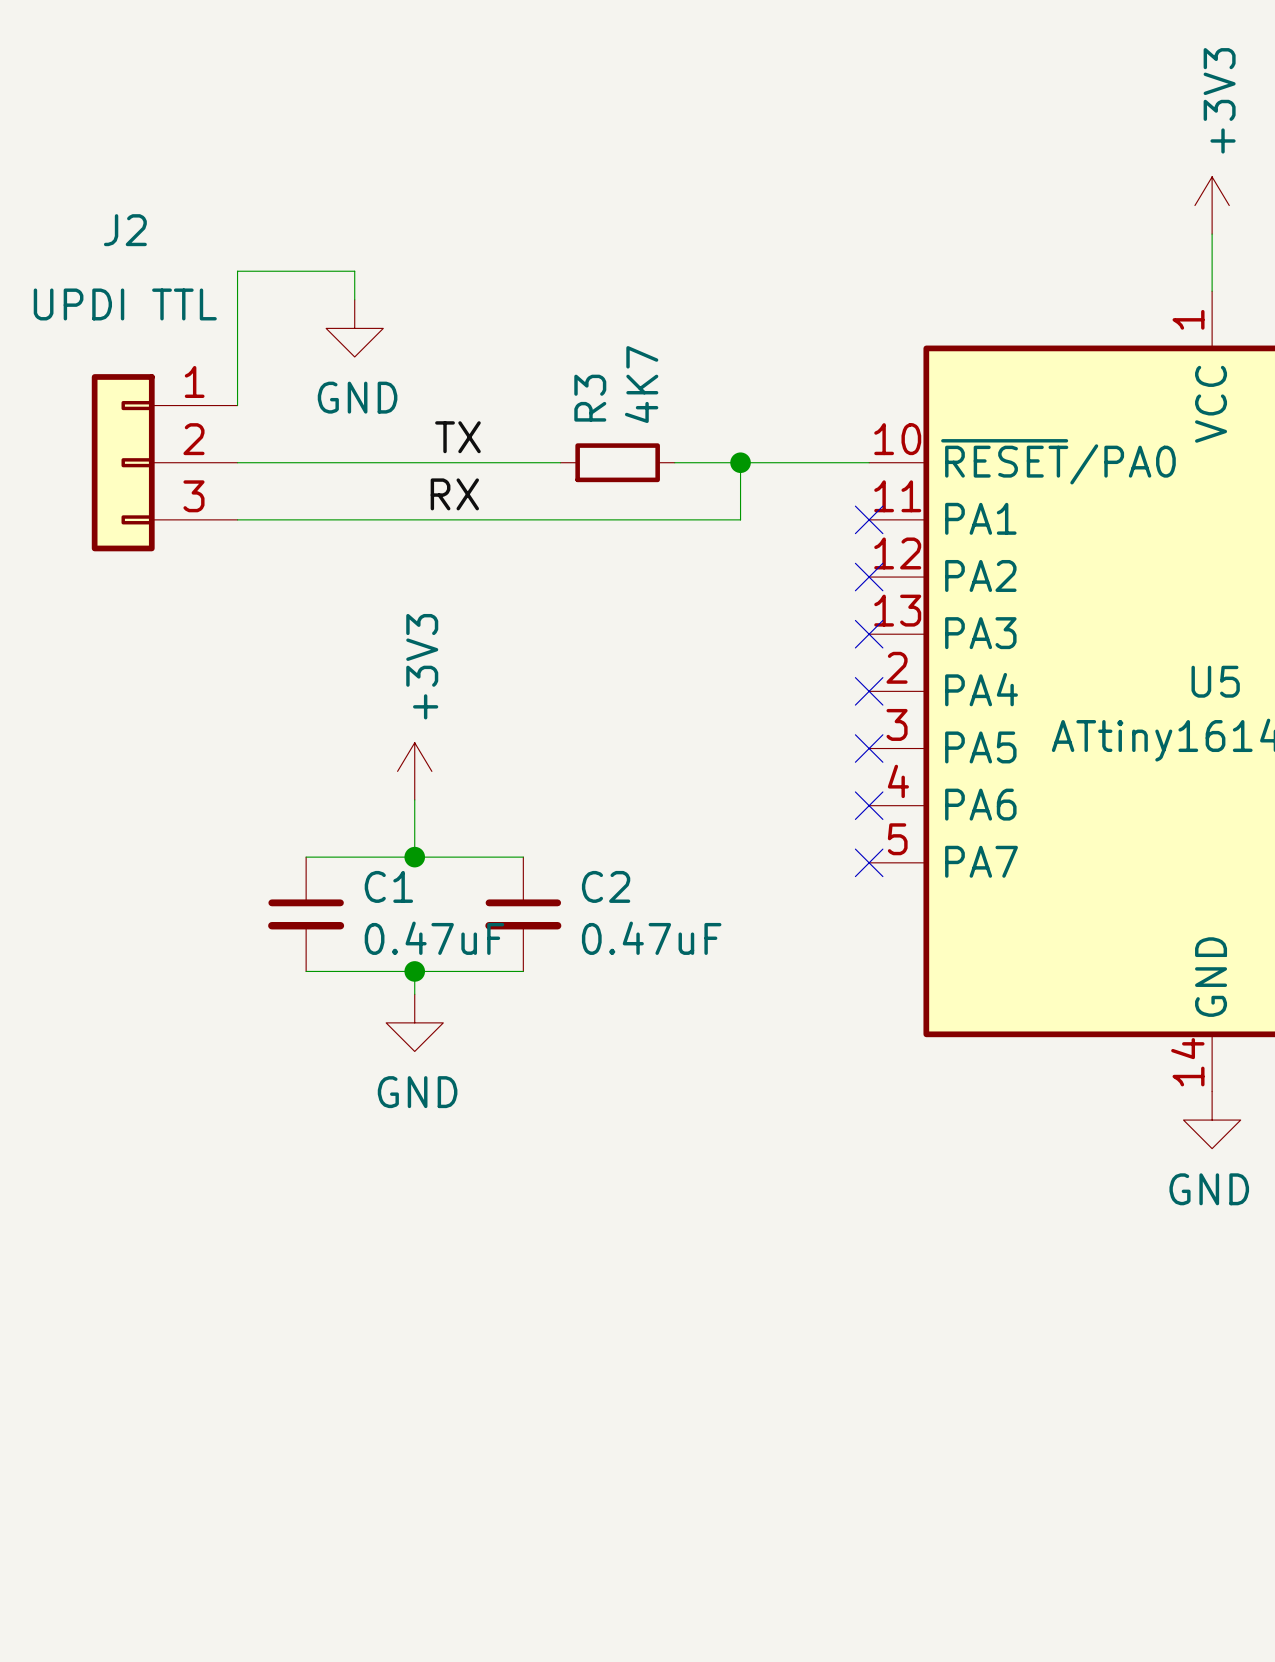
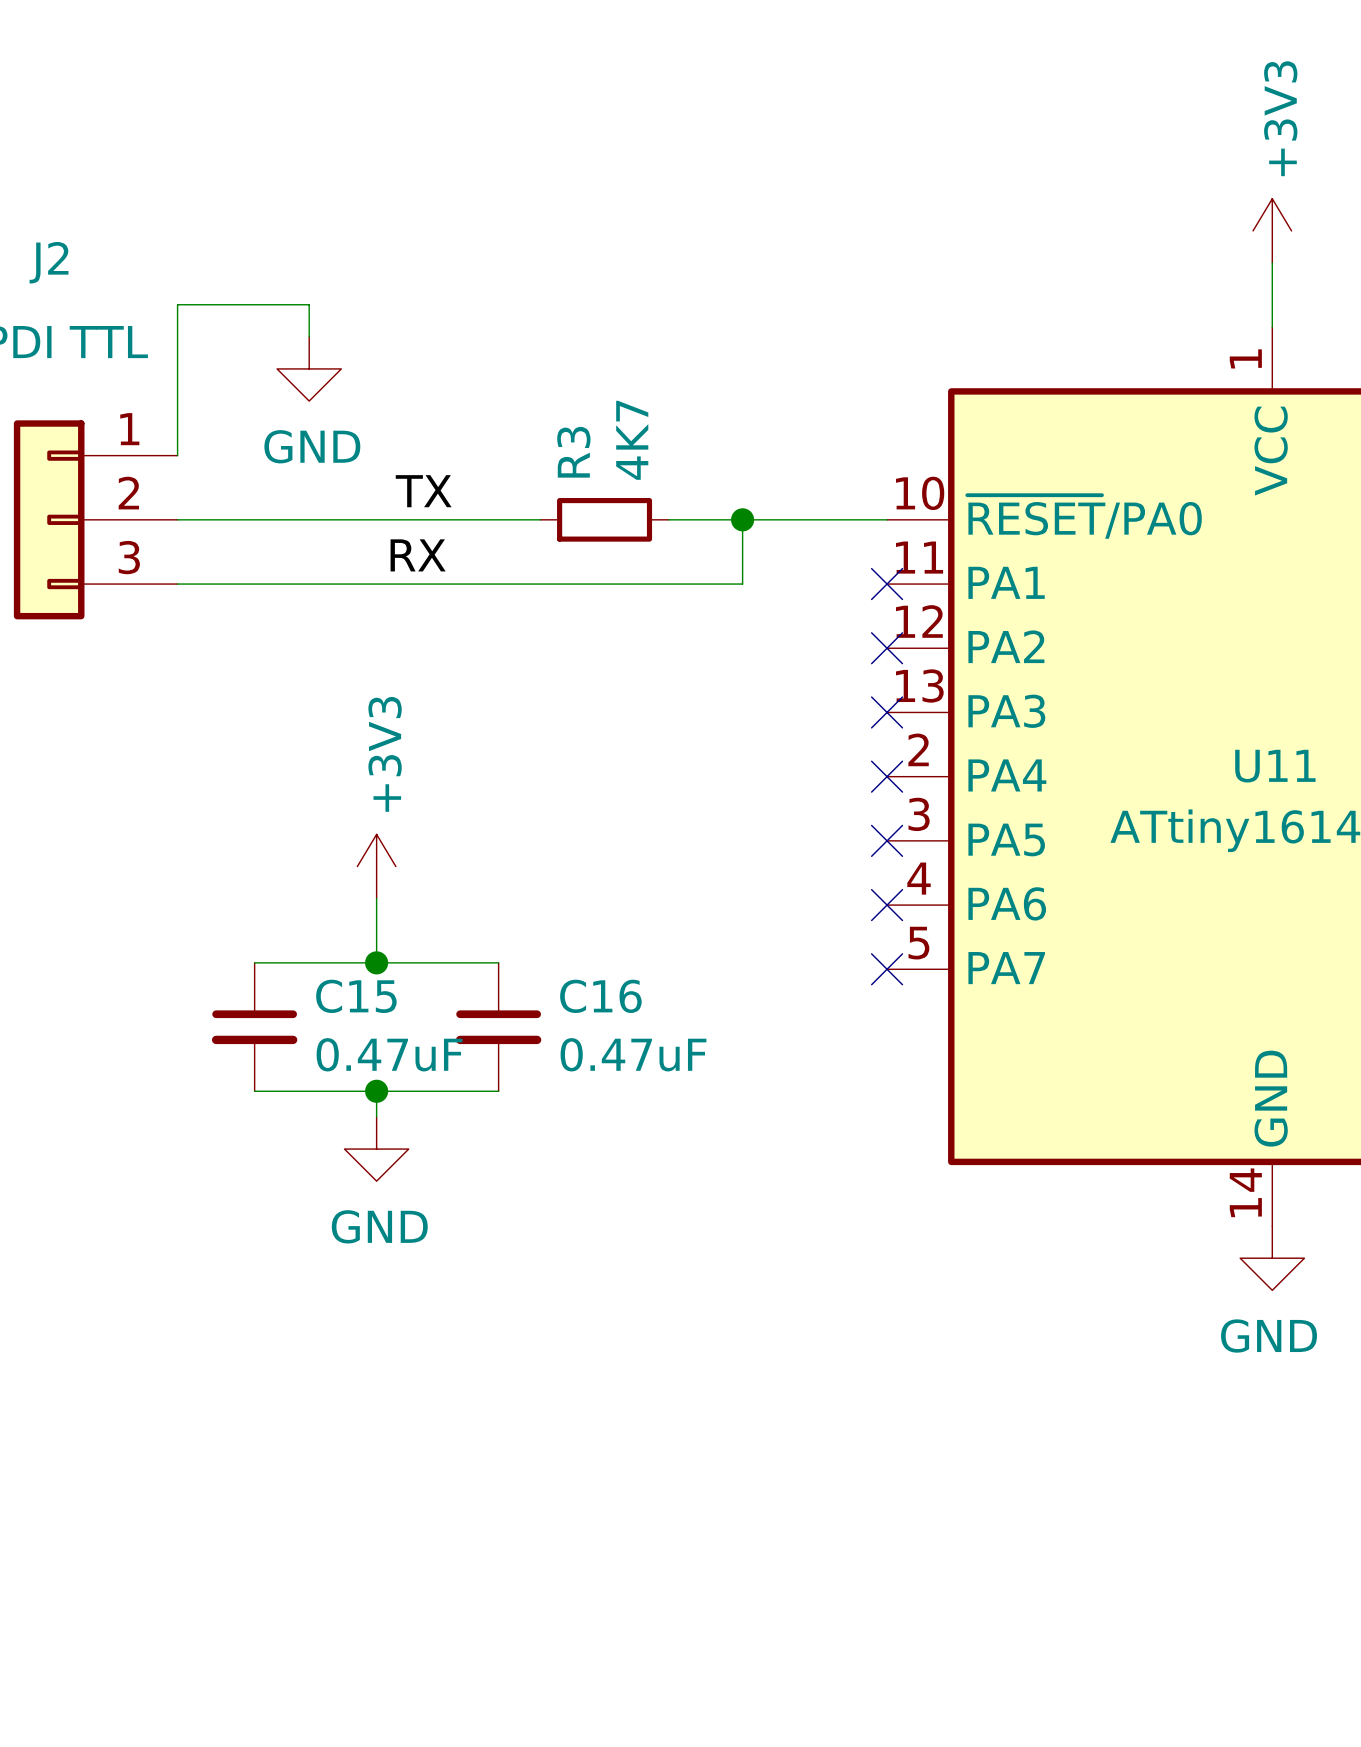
U5 name: U5 (1215, 681) -> U11 (1275, 766)
C1 name: C1 (388, 886) -> C15 (356, 996)
C2 name: C2 (606, 886) -> C16 (600, 996)

